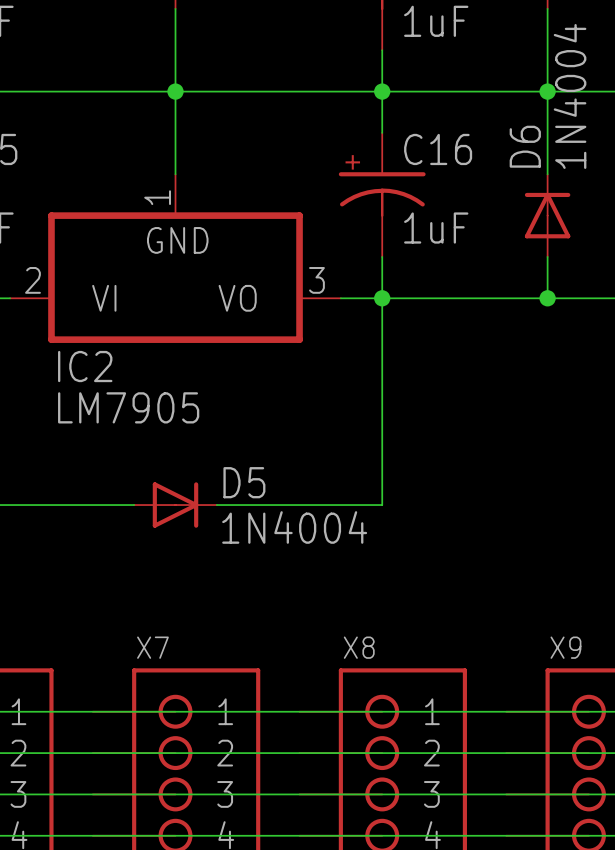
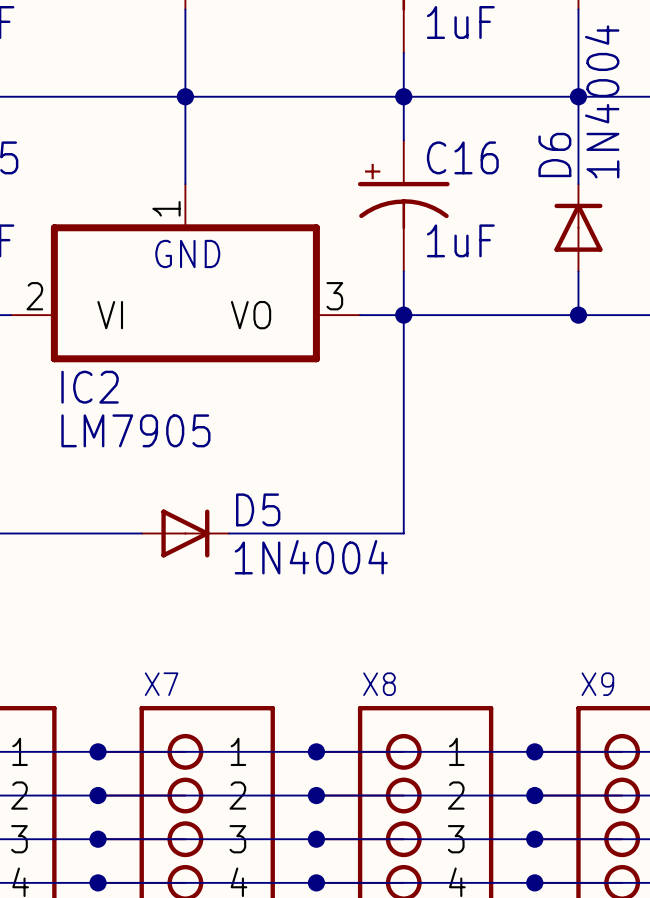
junction: none -> (98, 751)
junction: none -> (316, 751)
junction: none -> (534, 751)
junction: none -> (98, 795)
junction: none -> (316, 795)
junction: none -> (534, 795)
junction: none -> (98, 839)
junction: none -> (316, 839)
junction: none -> (534, 839)
junction: none -> (98, 882)
junction: none -> (316, 882)
junction: none -> (534, 882)

